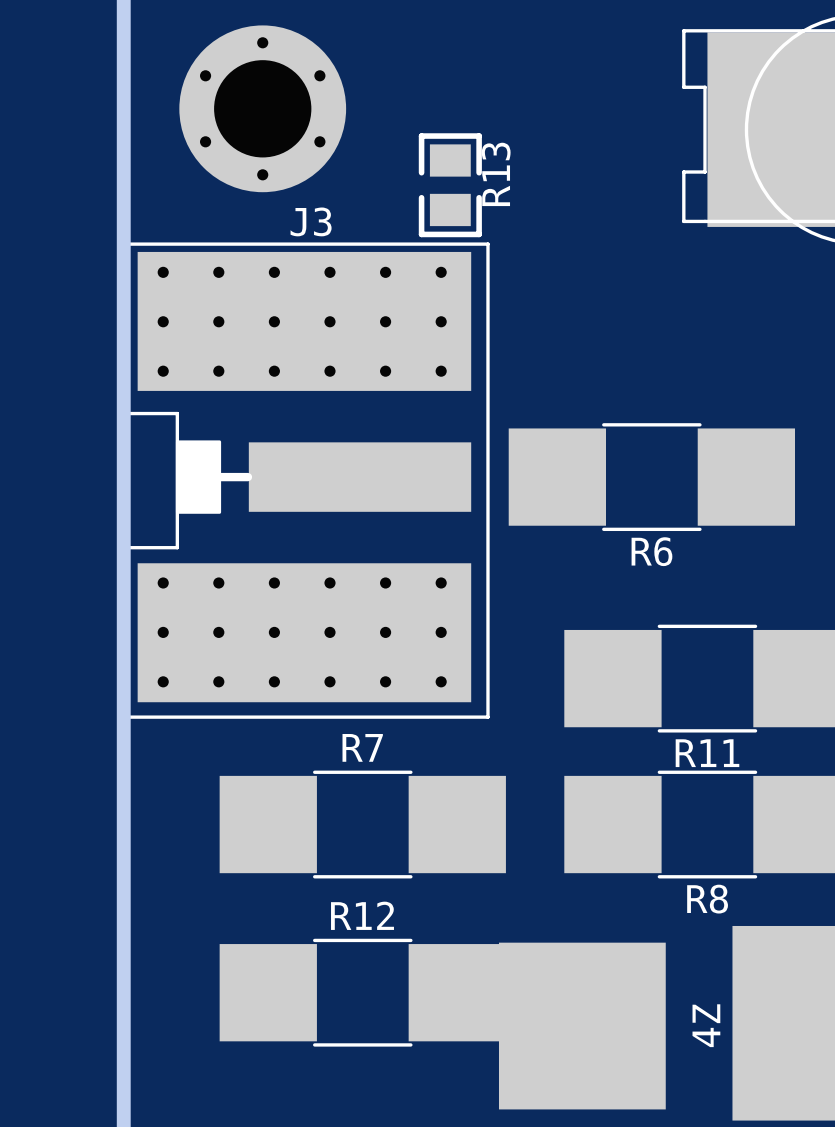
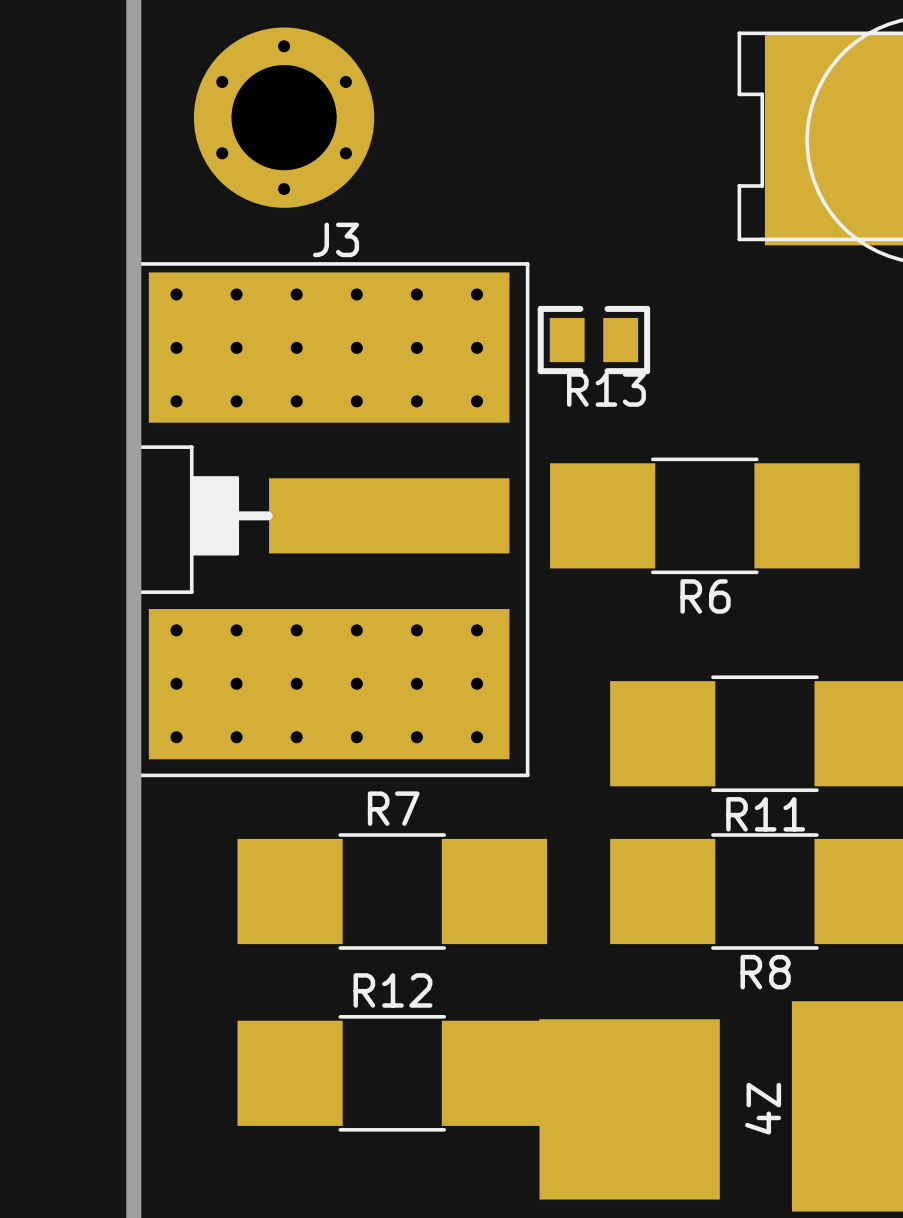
R13 rotation: 0° (450, 185) -> 90° clockwise (593, 340)
R13 position: (450, 185) -> (593, 340)

